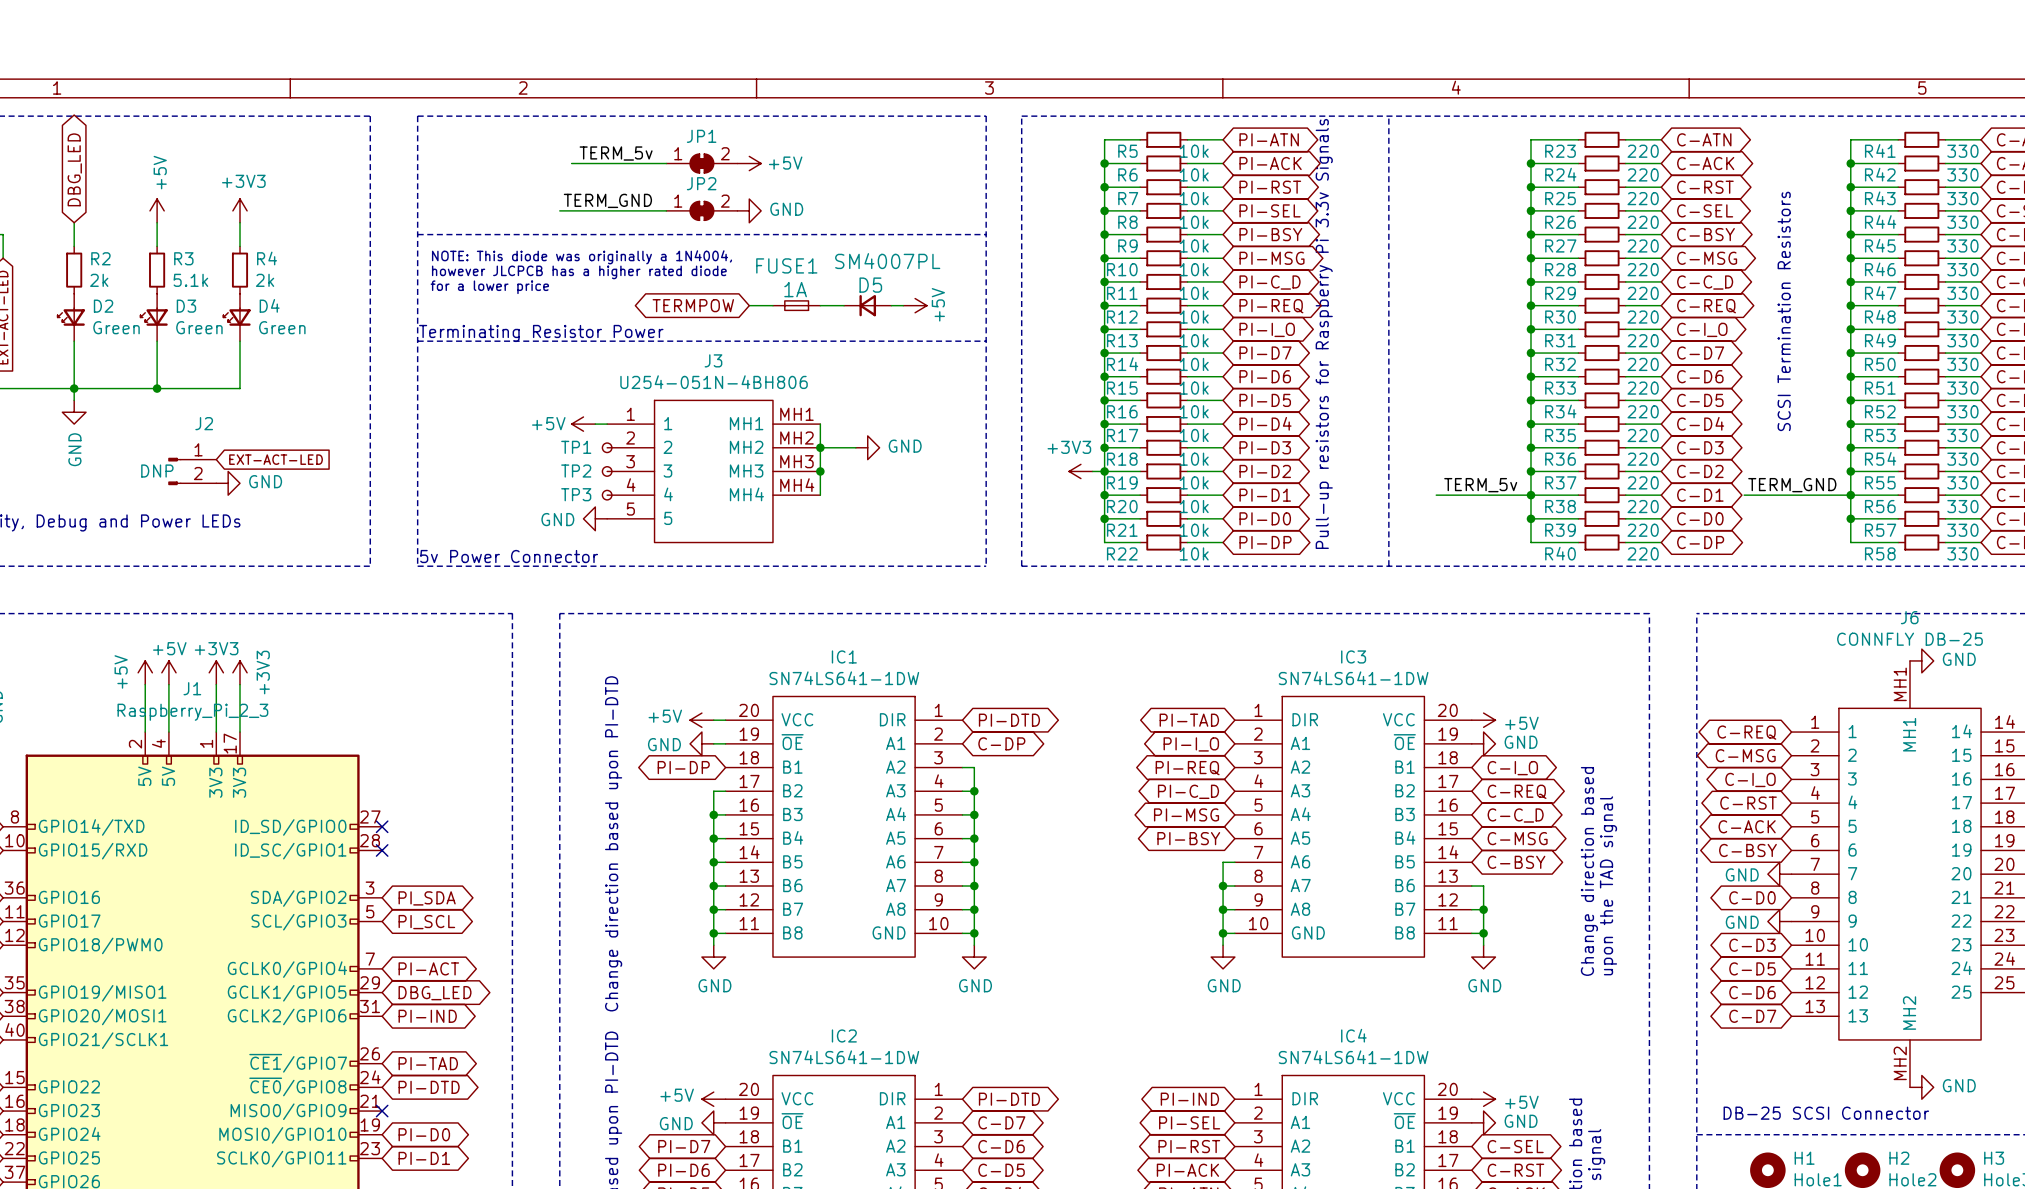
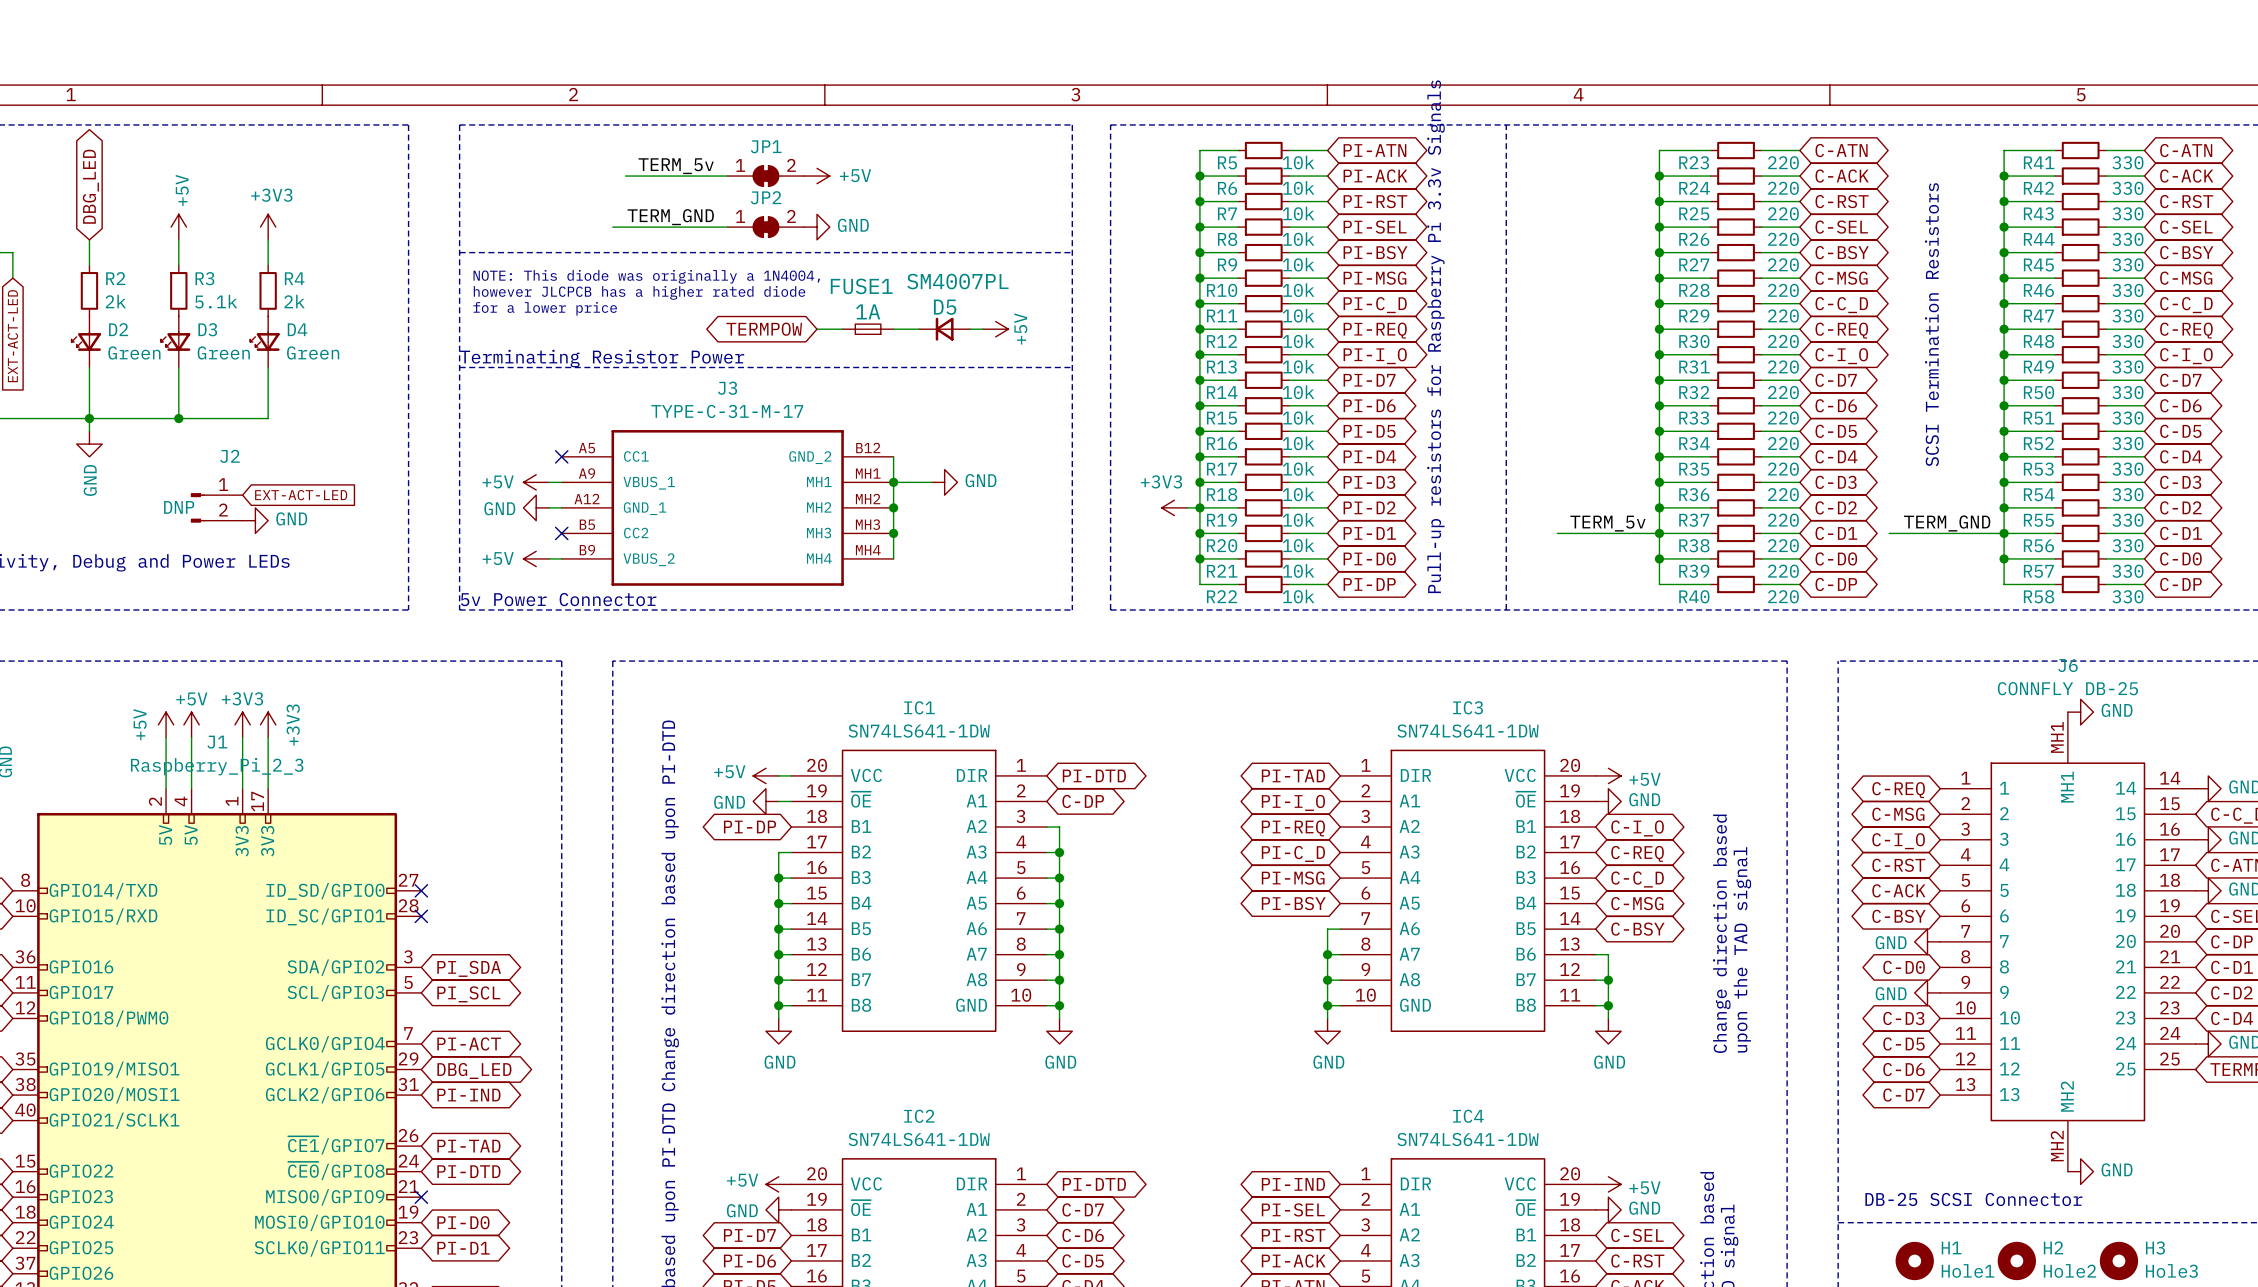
J3 value: U254-051N-4BH806 (714, 382) -> TYPE-C-31-M-17 (727, 411)
J3 symbol: [607, 399, 821, 544] -> [561, 430, 894, 586]
no-connect mark: none -> (561, 456)
power symbol: +5V (583, 424) -> none
wire: (595, 424) (607, 424) -> (548, 482) (561, 482)
power symbol: none -> +5V (536, 482)
TP1: (607, 447) -> none
wire: none -> (548, 507) (561, 507)
TP2: (607, 471) -> none
no-connect mark: none -> (561, 533)
TP3: (607, 495) -> none
wire: none -> (893, 533) (893, 558)
junction: none -> (893, 533)
power symbol: none -> +5V (536, 558)
wire: none -> (548, 558) (561, 558)
power symbol position: GND (595, 518) -> GND (536, 507)

